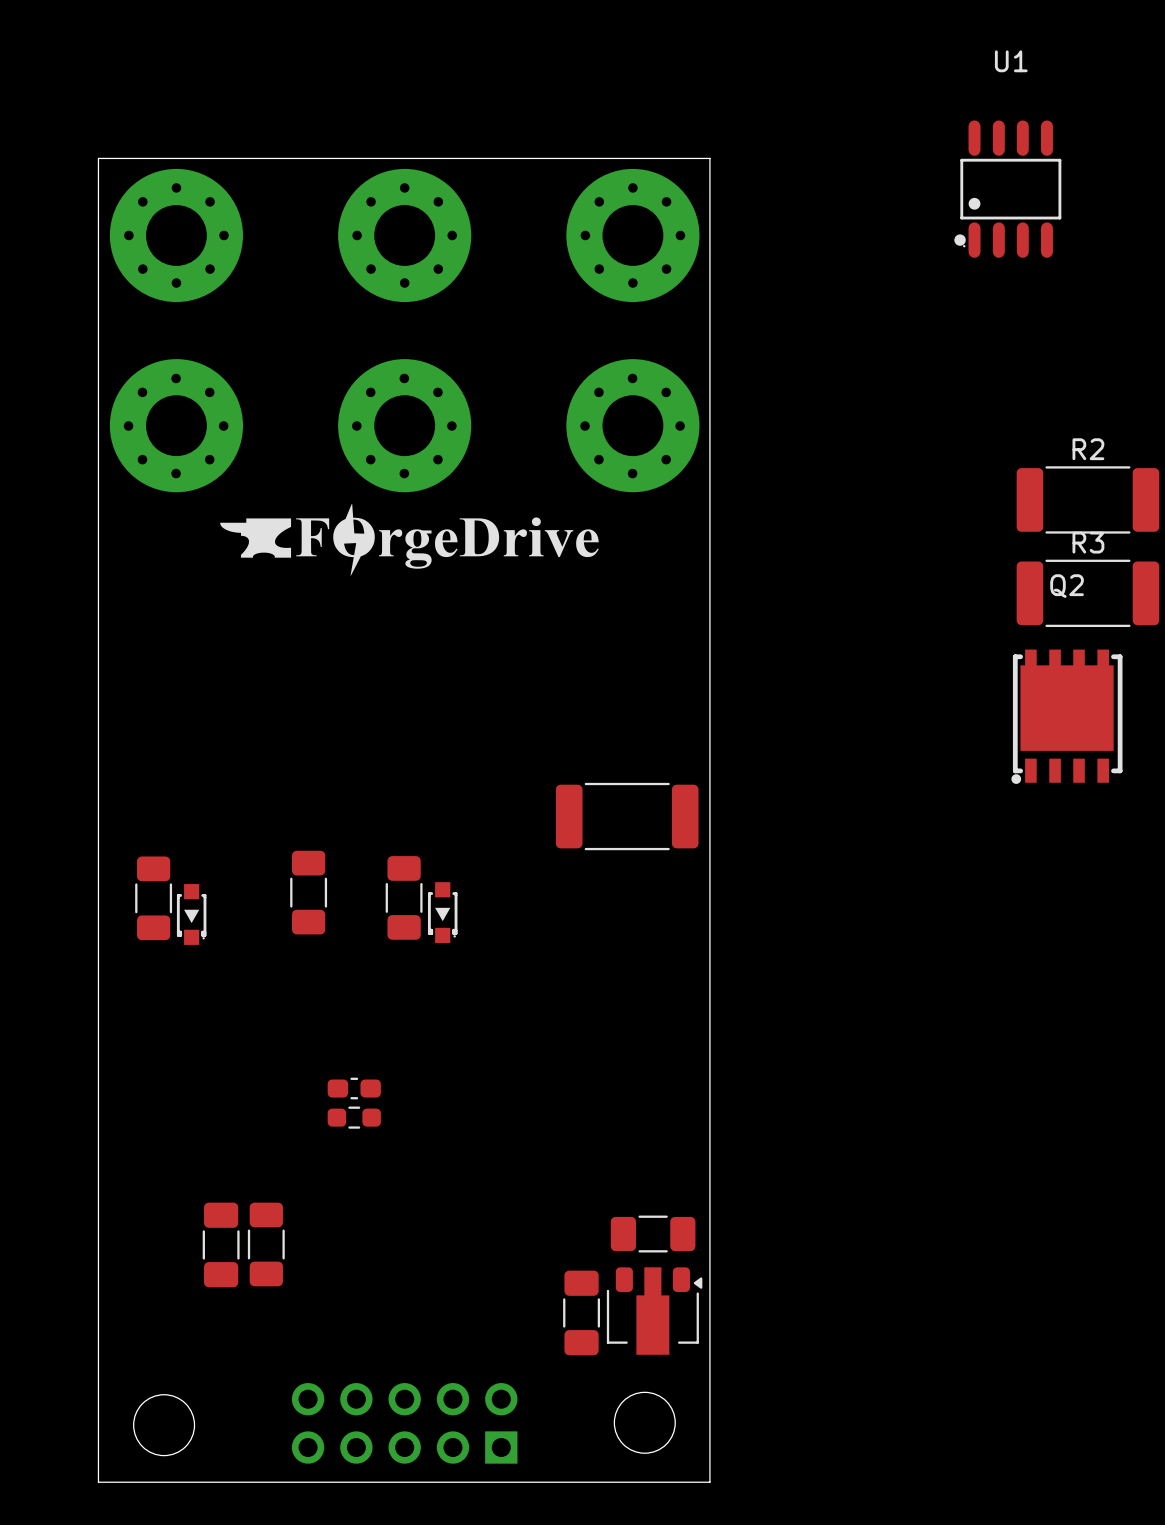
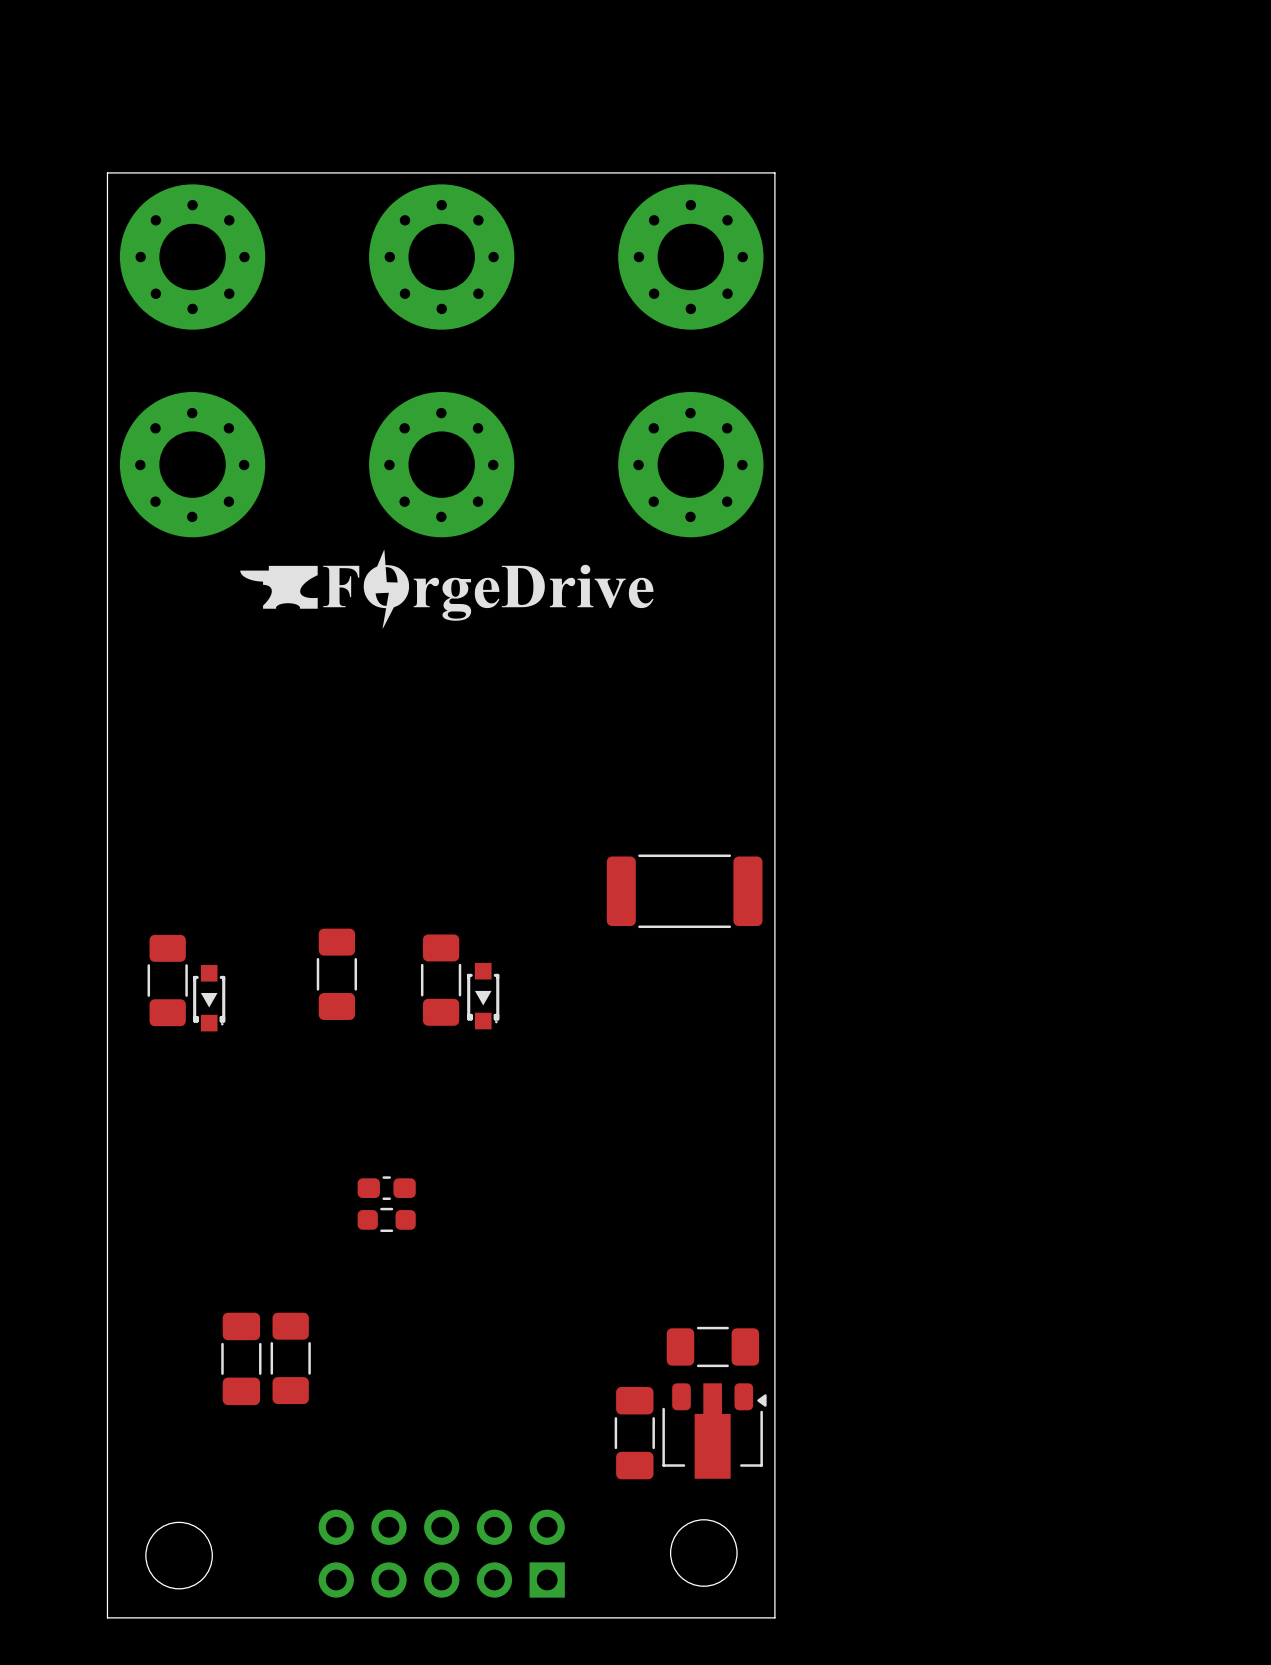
U1: (1007, 189) -> none
R2: (1087, 499) -> none
R3: (1087, 593) -> none
Q2: (1066, 716) -> none

